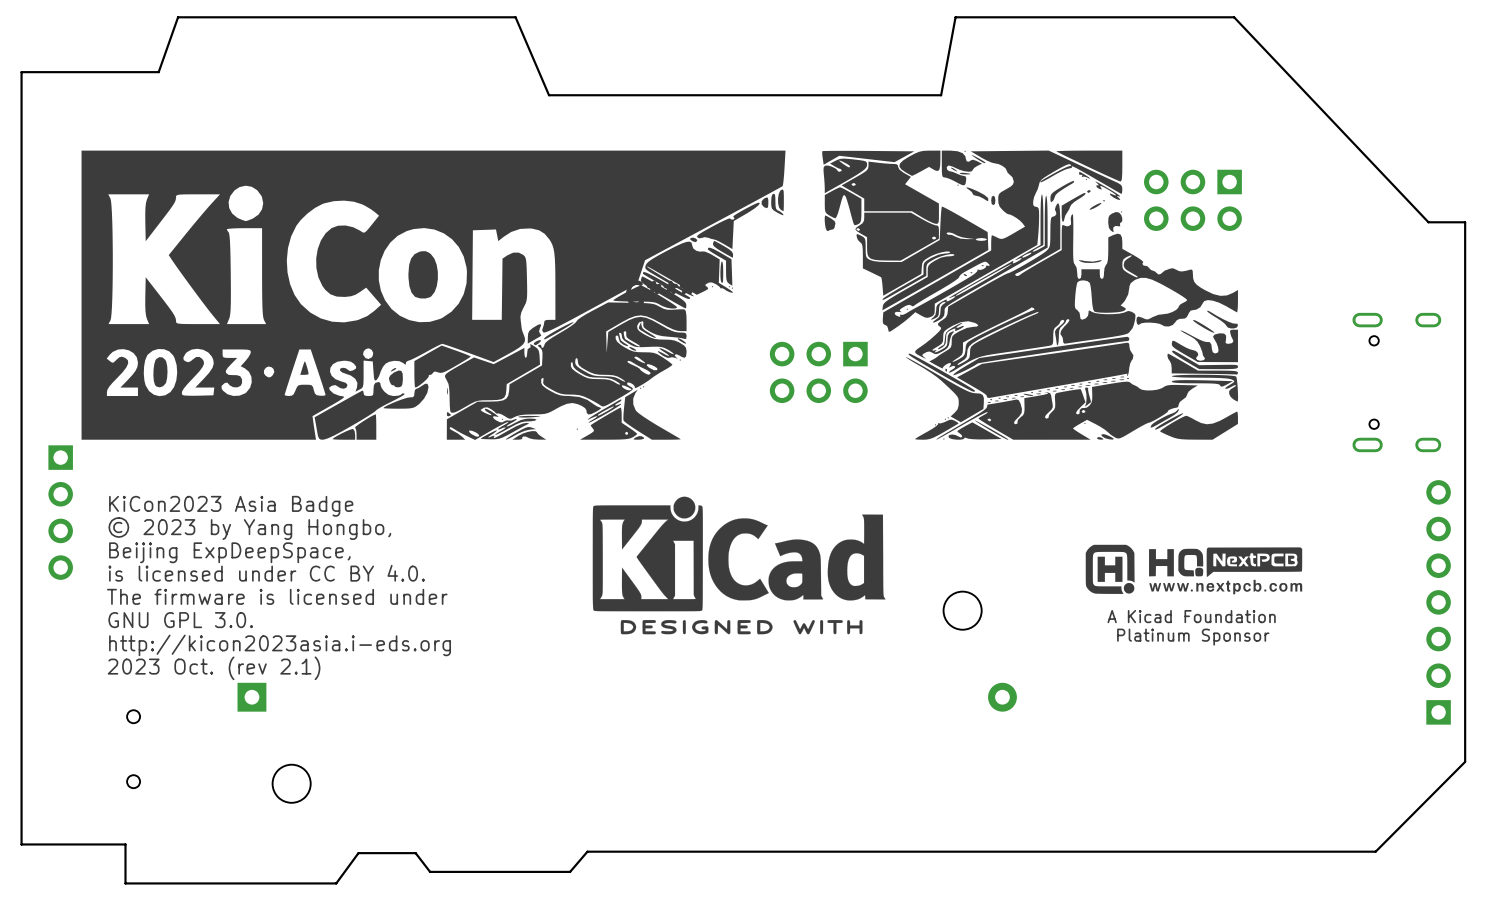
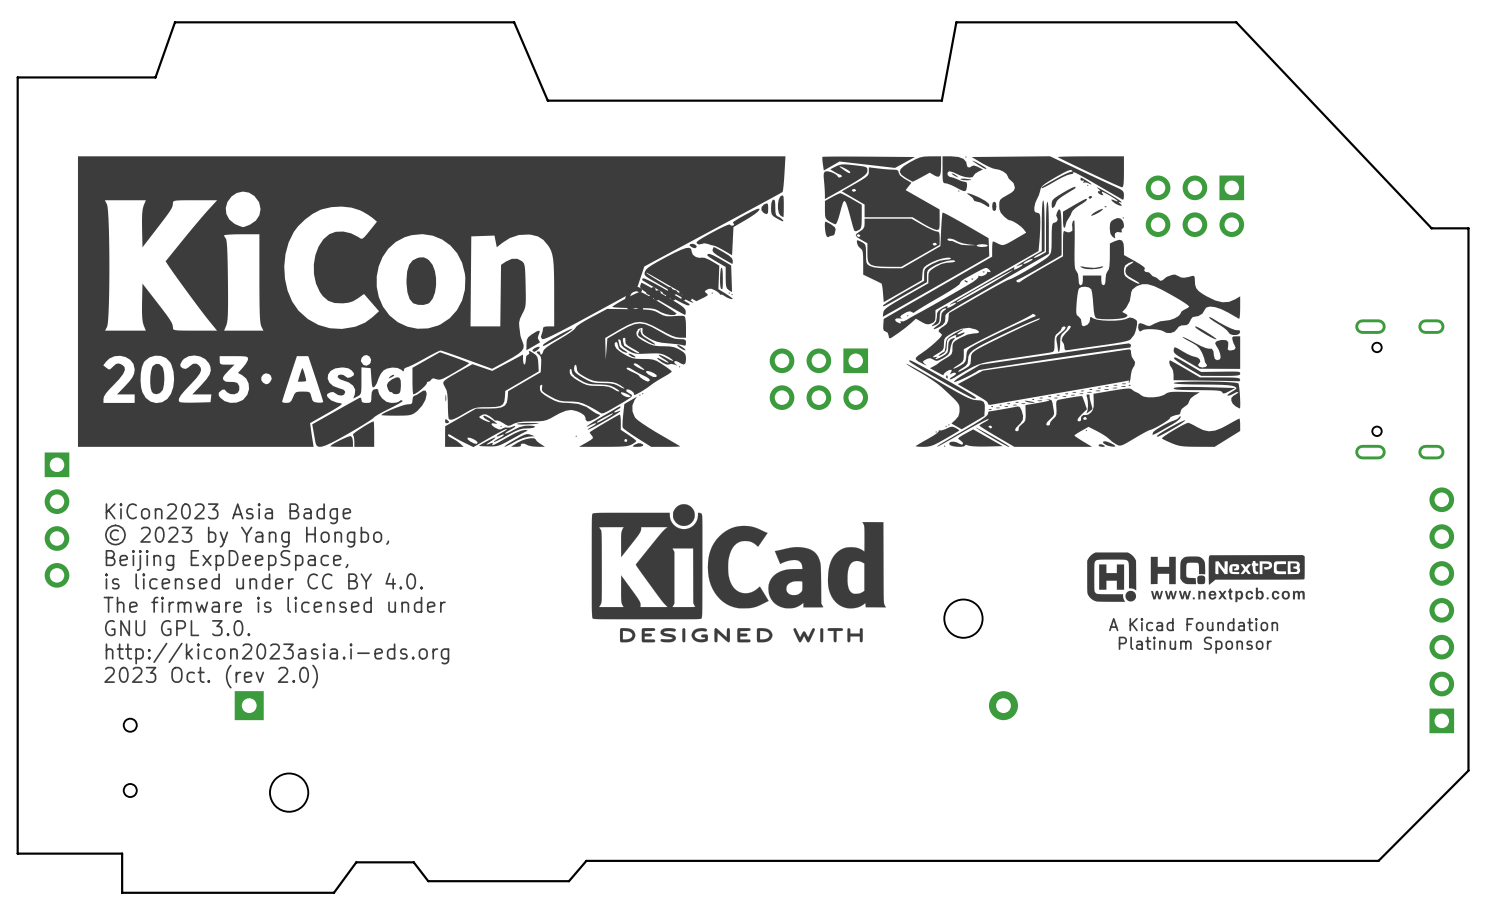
text: 2023 Oct. (rev 2.1) (214, 668) -> 2023 Oct. (rev 2.0) (211, 676)

